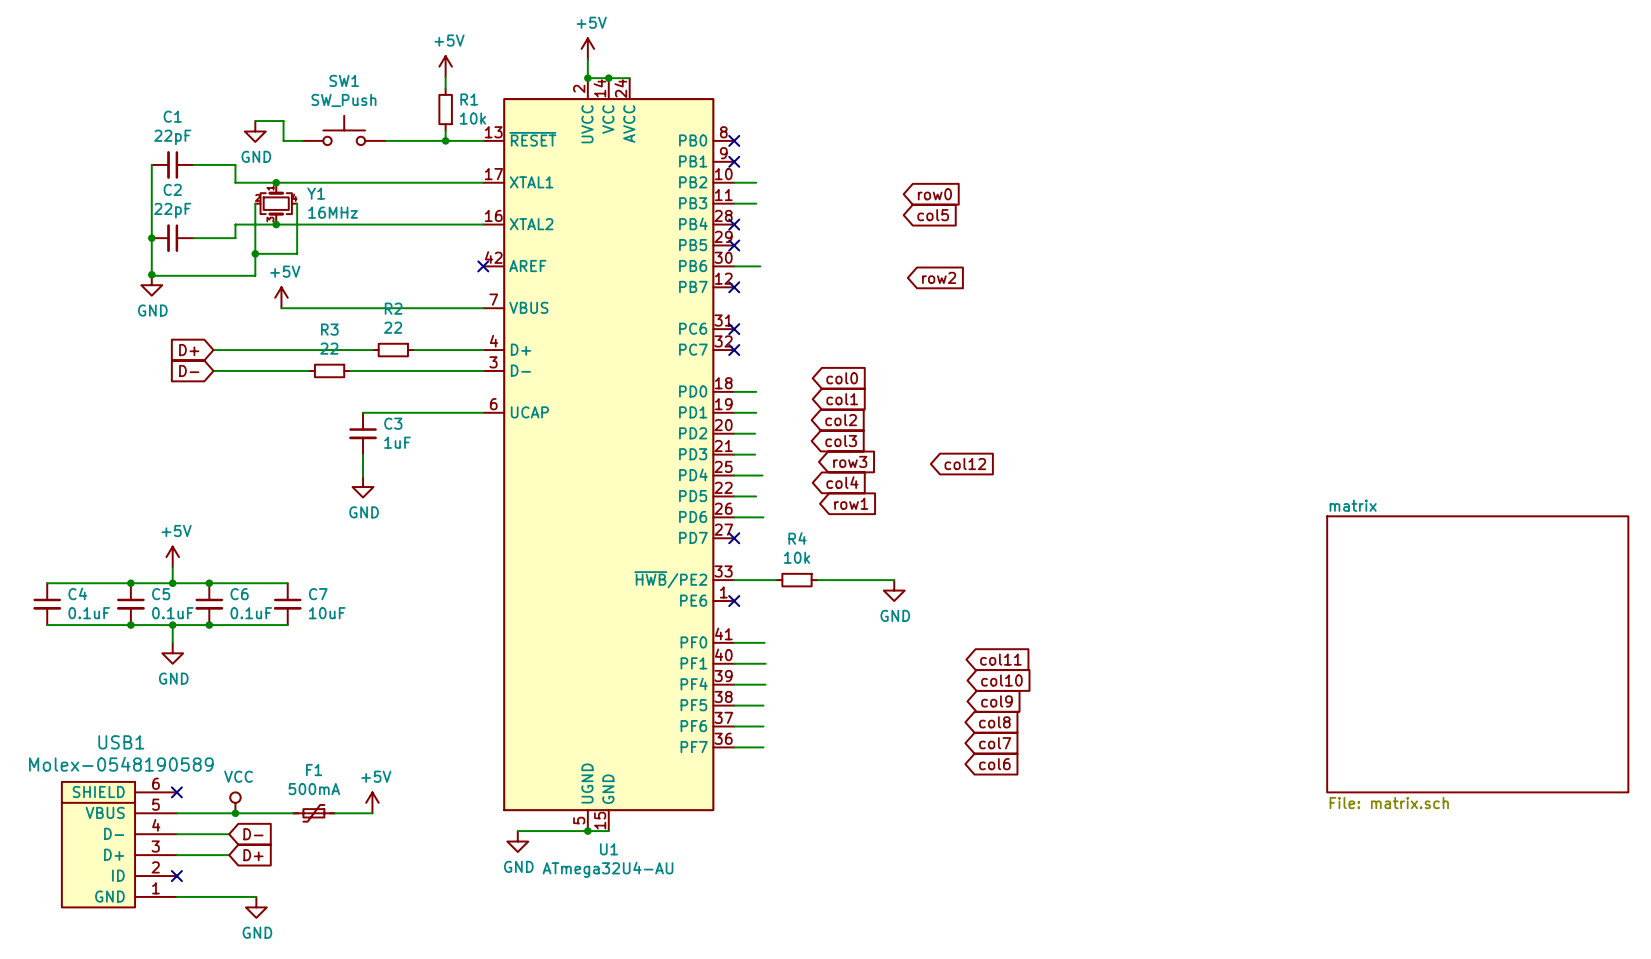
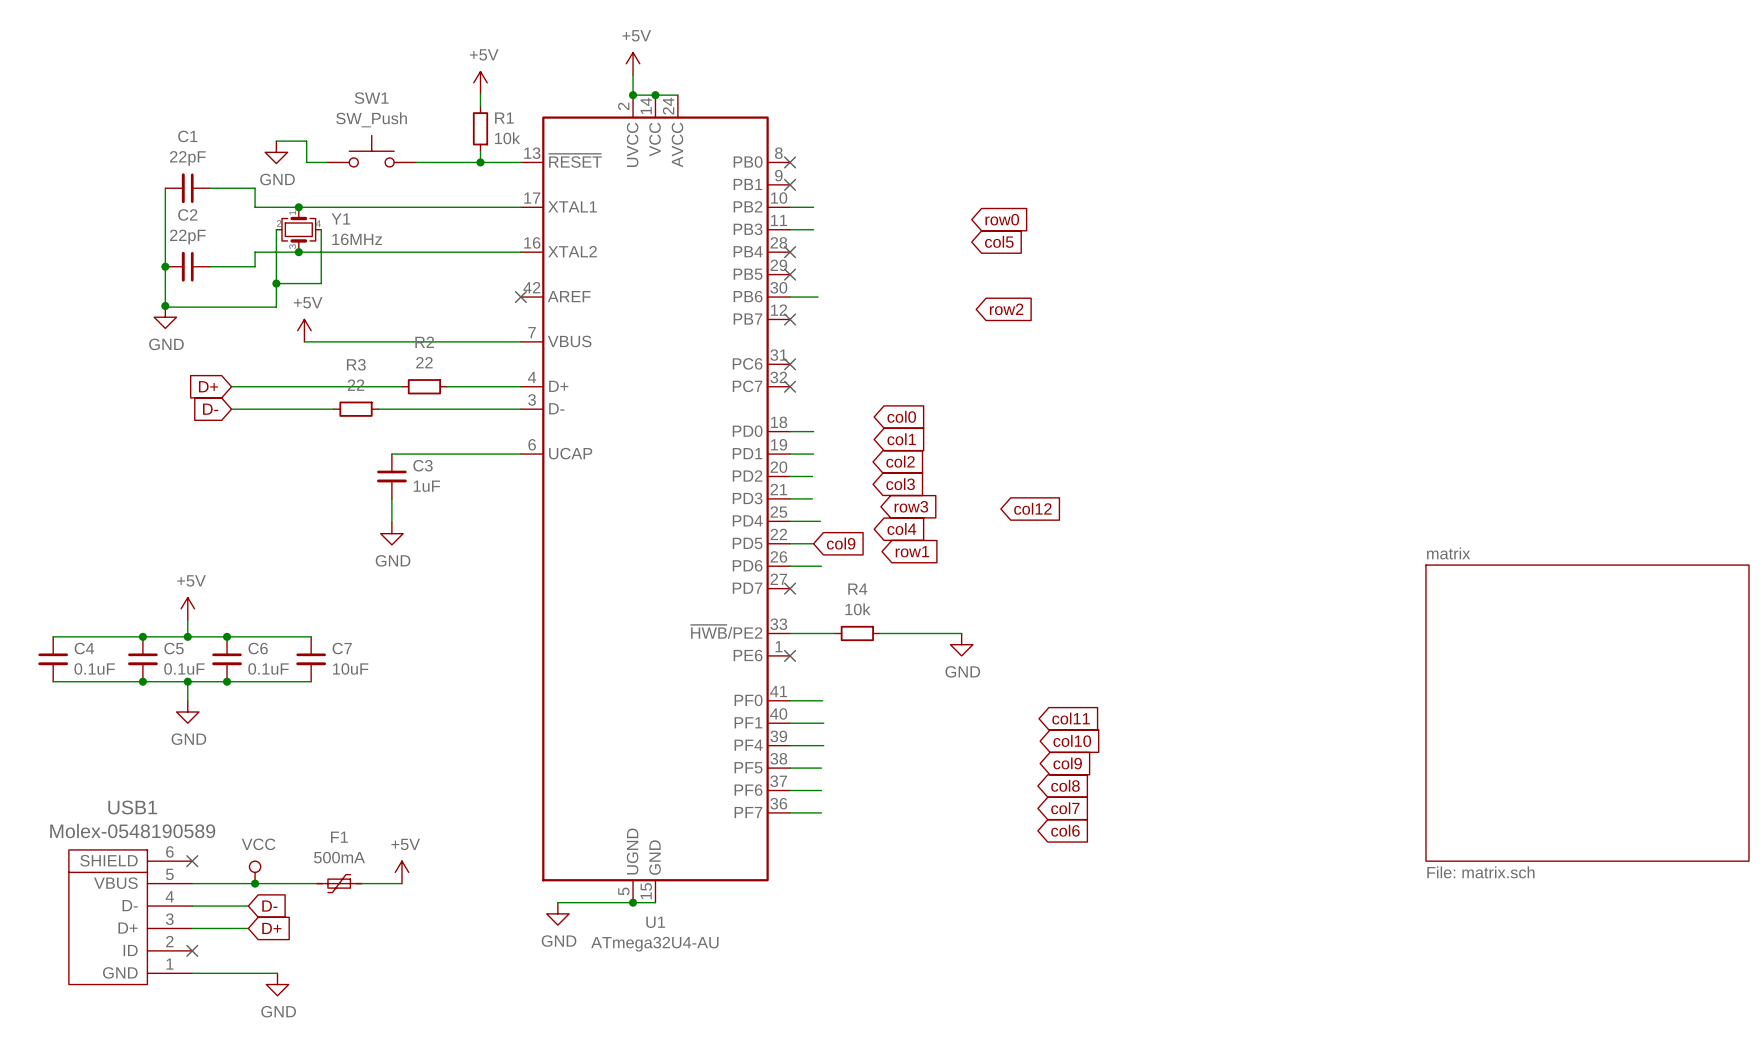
global label: none -> col9 (841, 543)

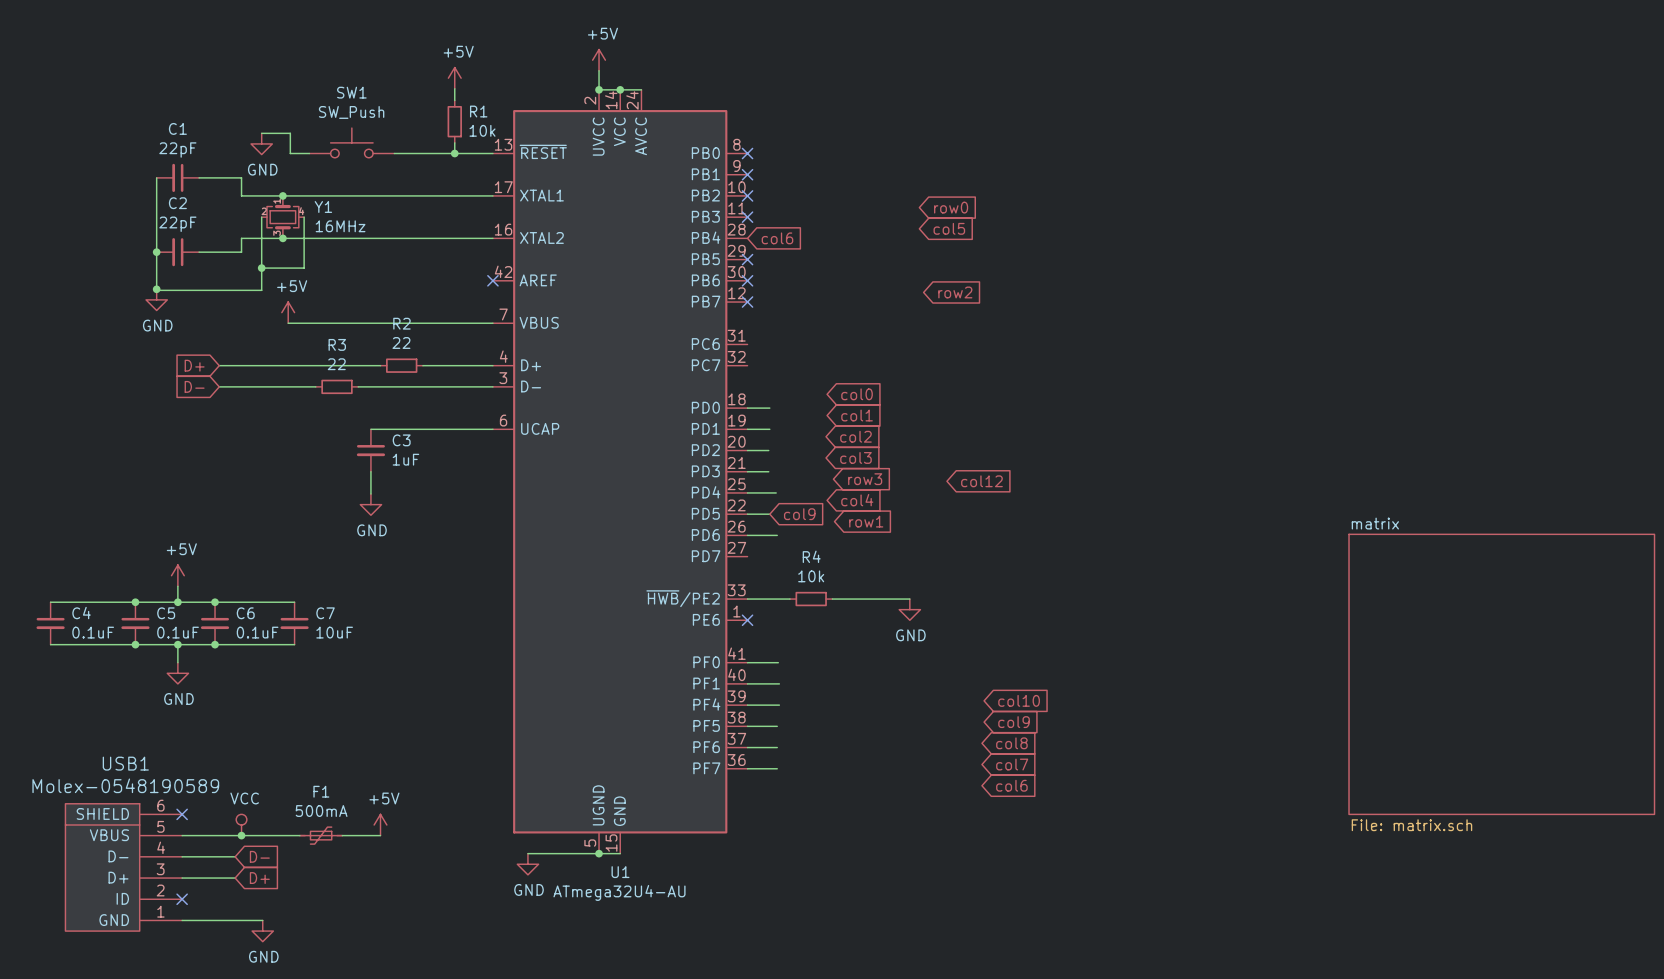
wire: (790, 207) (813, 207) -> none
no-connect mark: none -> (747, 195)
wire: (790, 229) (813, 229) -> none
no-connect mark: none -> (747, 217)
global label: none -> col6 (777, 238)
no-connect mark: (790, 252) -> none
wire: (790, 297) (818, 297) -> none
no-connect mark: none -> (747, 280)
no-connect mark: (790, 364) -> none
no-connect mark: (790, 386) -> none
no-connect mark: (790, 588) -> none
global label: col11 (1071, 718) -> none

